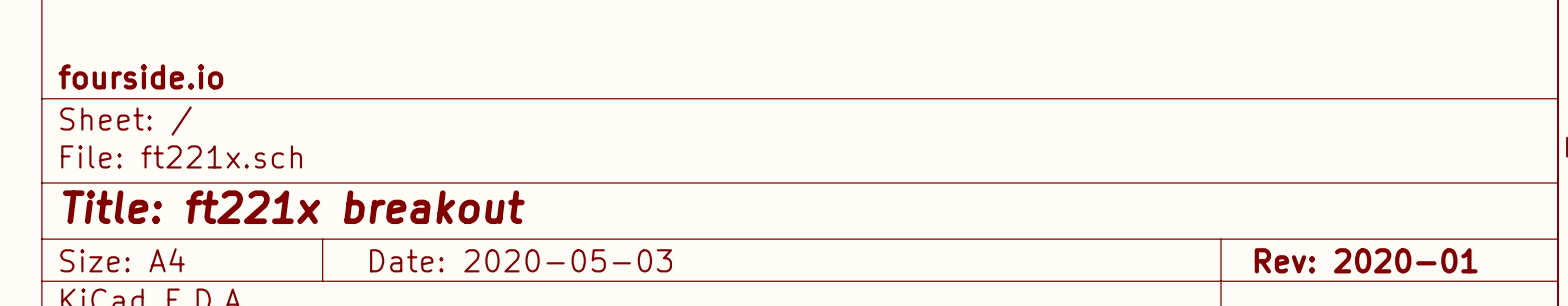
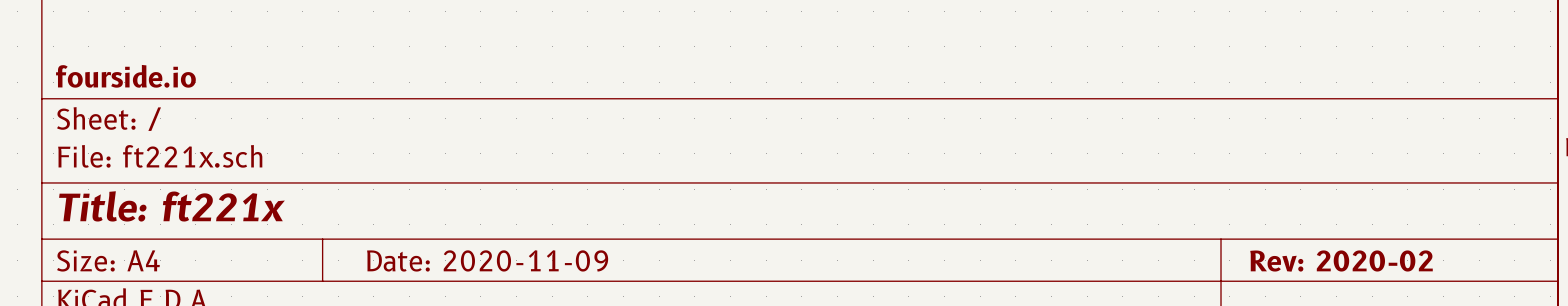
title block: Title: ft221x breakout (293, 207) -> Title: ft221x (171, 206)
title block: Date: 2020-05-03 (521, 260) -> Date: 2020-11-09 (487, 260)
title block: Rev: 2020-01 (1366, 260) -> Rev: 2020-02 (1341, 261)

